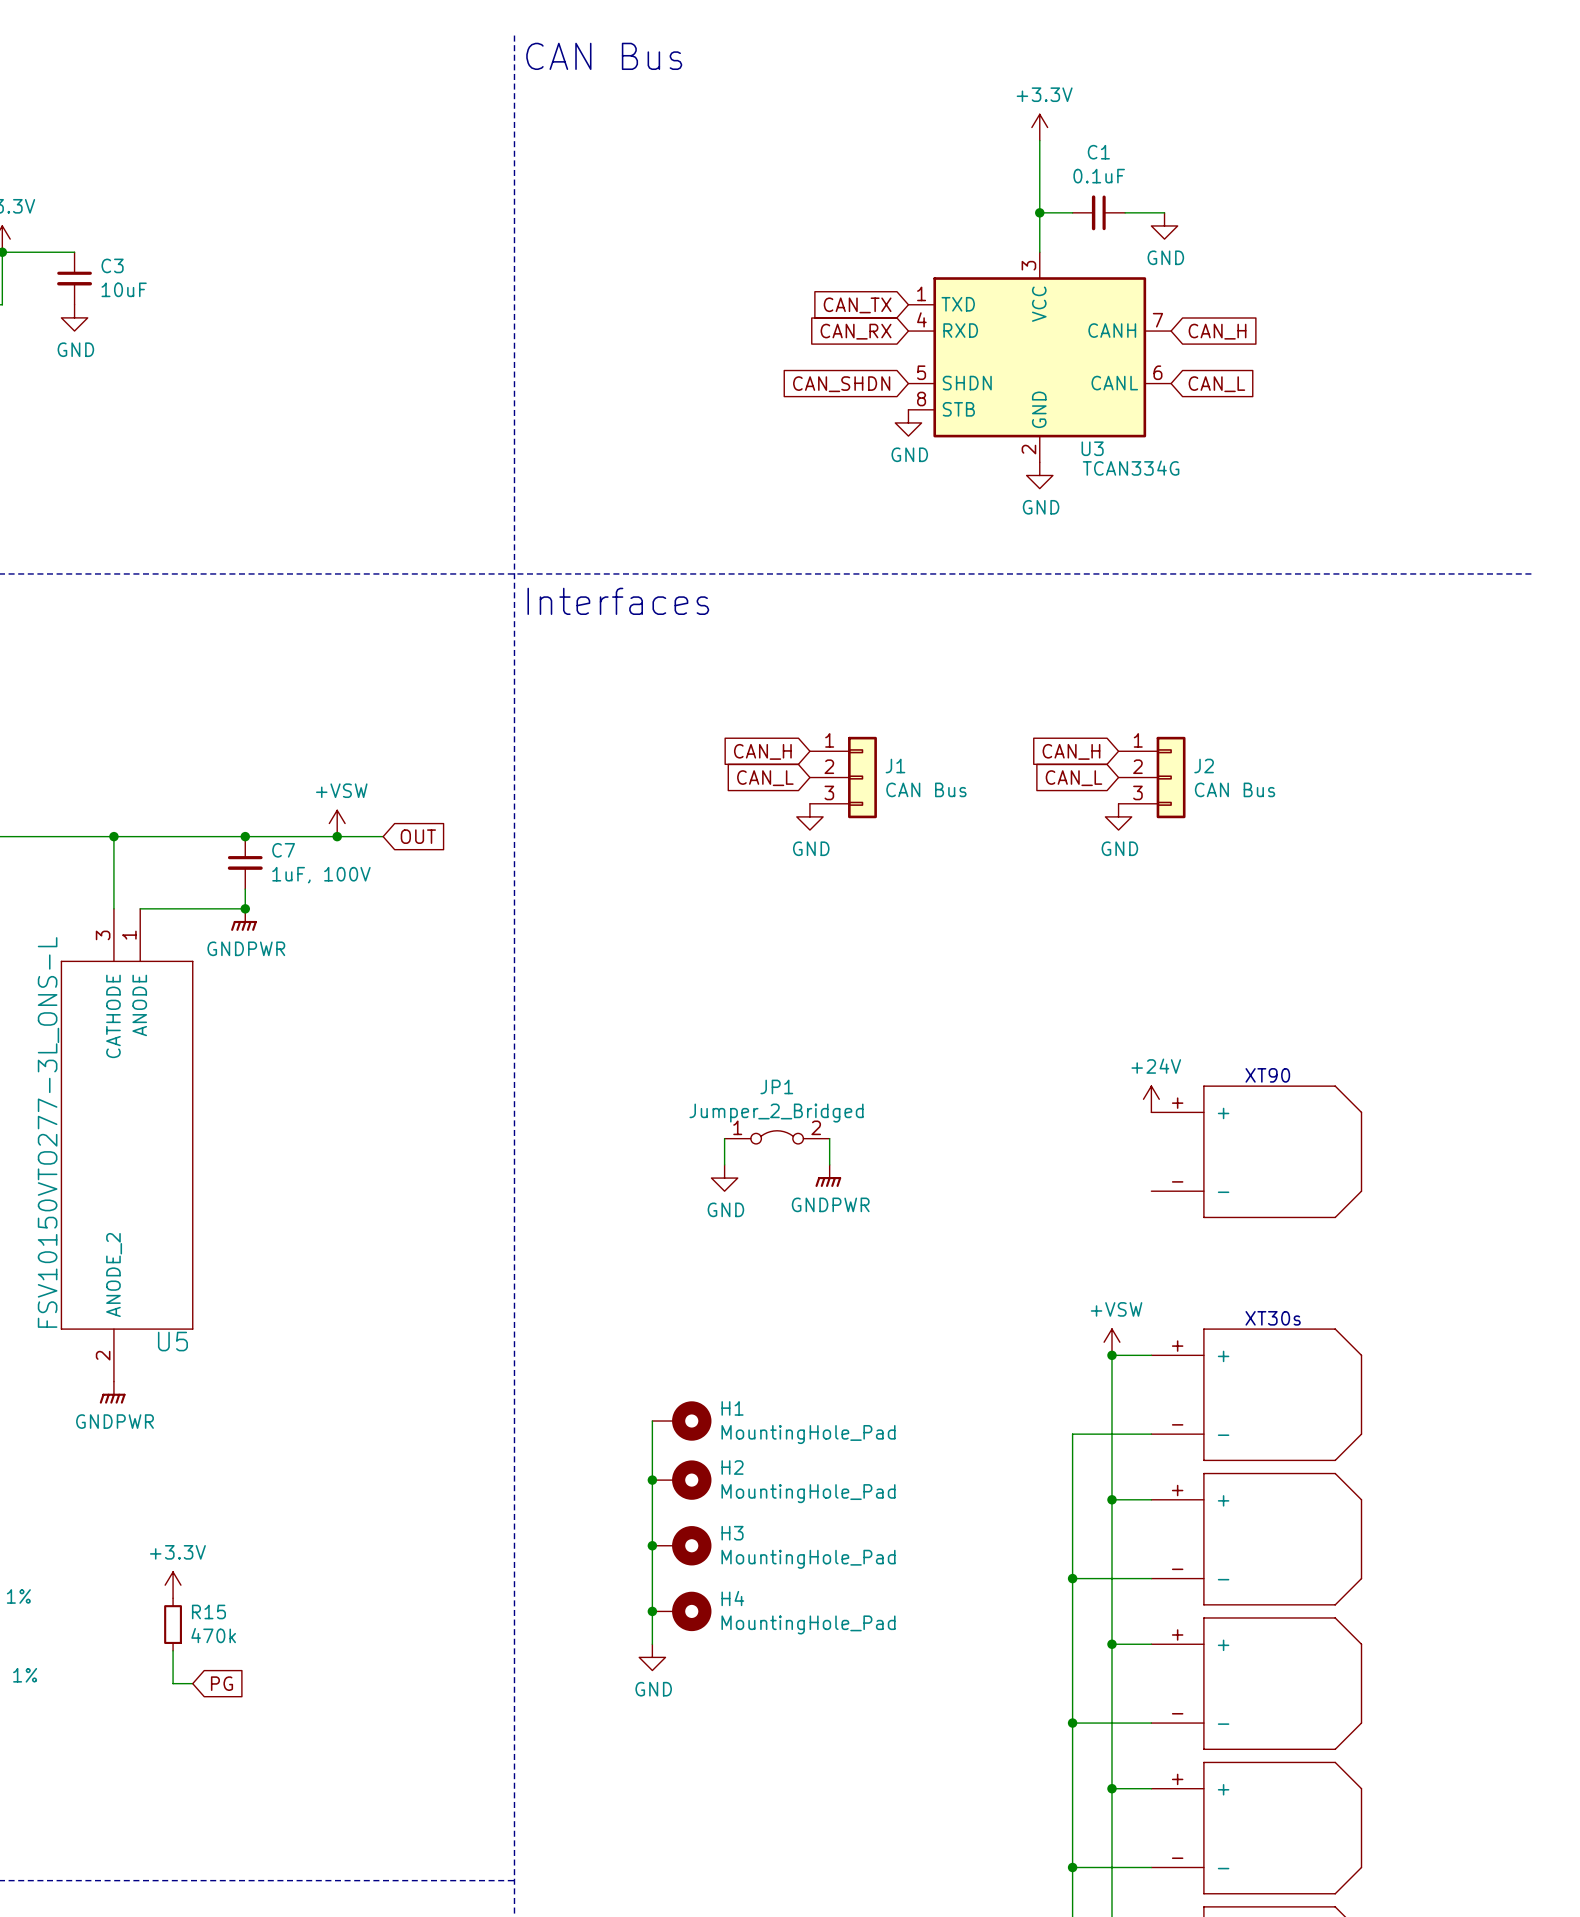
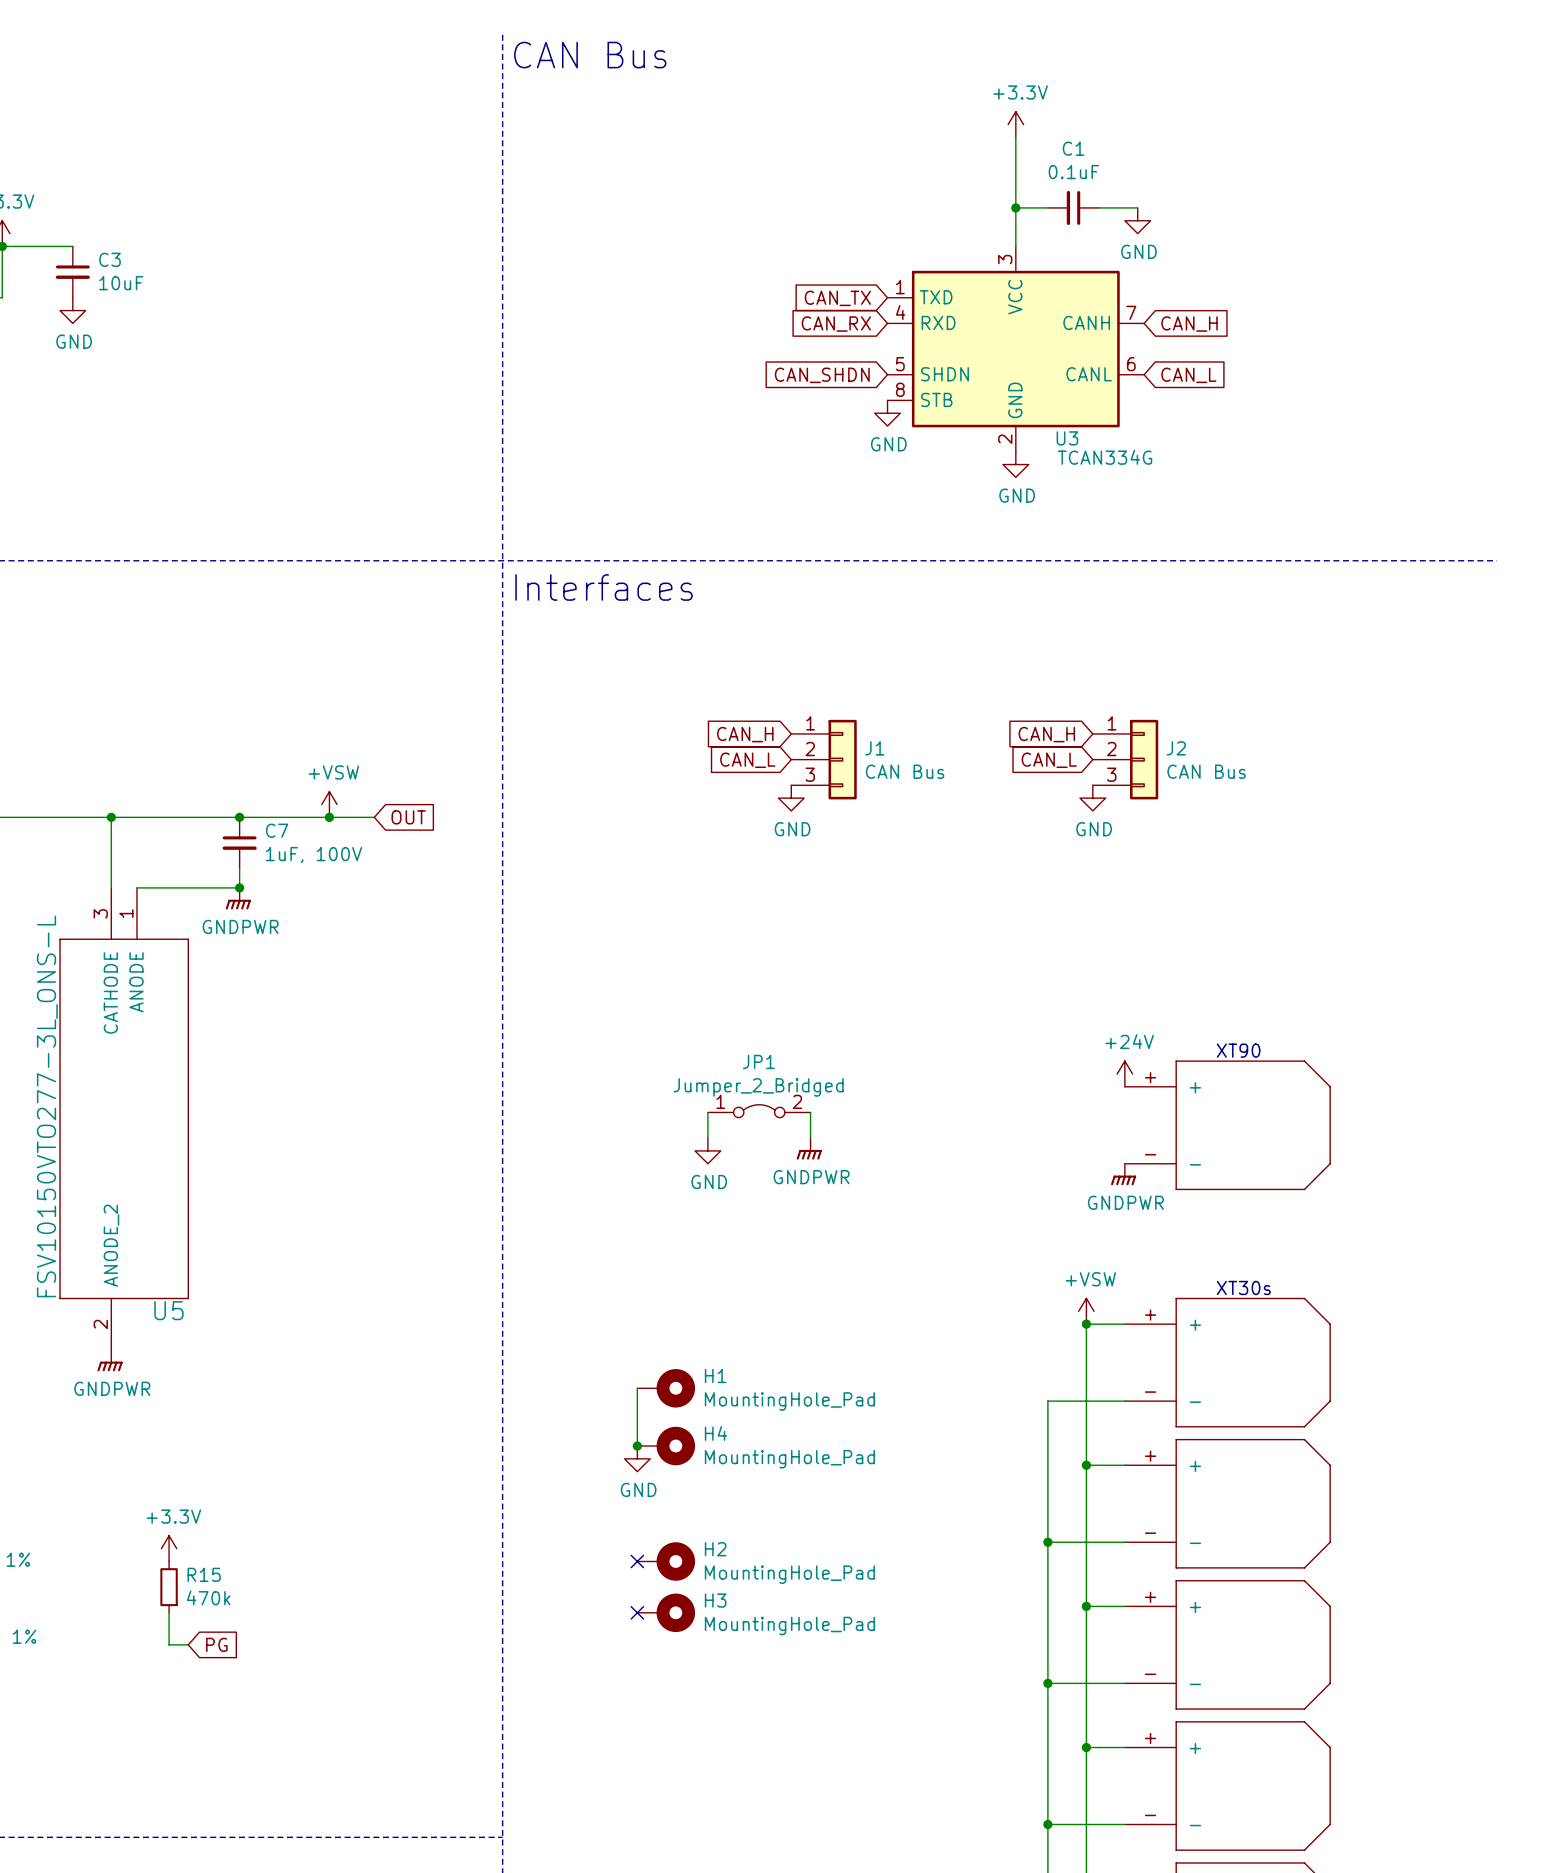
power symbol: none -> GNDPWR (1123, 1174)
H2 name: H2 (732, 1467) -> H4 (715, 1433)
wire: (652, 1480) (652, 1644) -> none
junction: (652, 1545) -> none
H3 position: (681, 1545) -> (666, 1612)
no-connect mark: none -> (637, 1561)
H2: none -> MountingHole_Pad (666, 1561)
junction: (652, 1611) -> none
H4: MountingHole_Pad (681, 1611) -> none
no-connect mark: none -> (637, 1612)
power symbol position: GND (652, 1657) -> GND (637, 1458)

